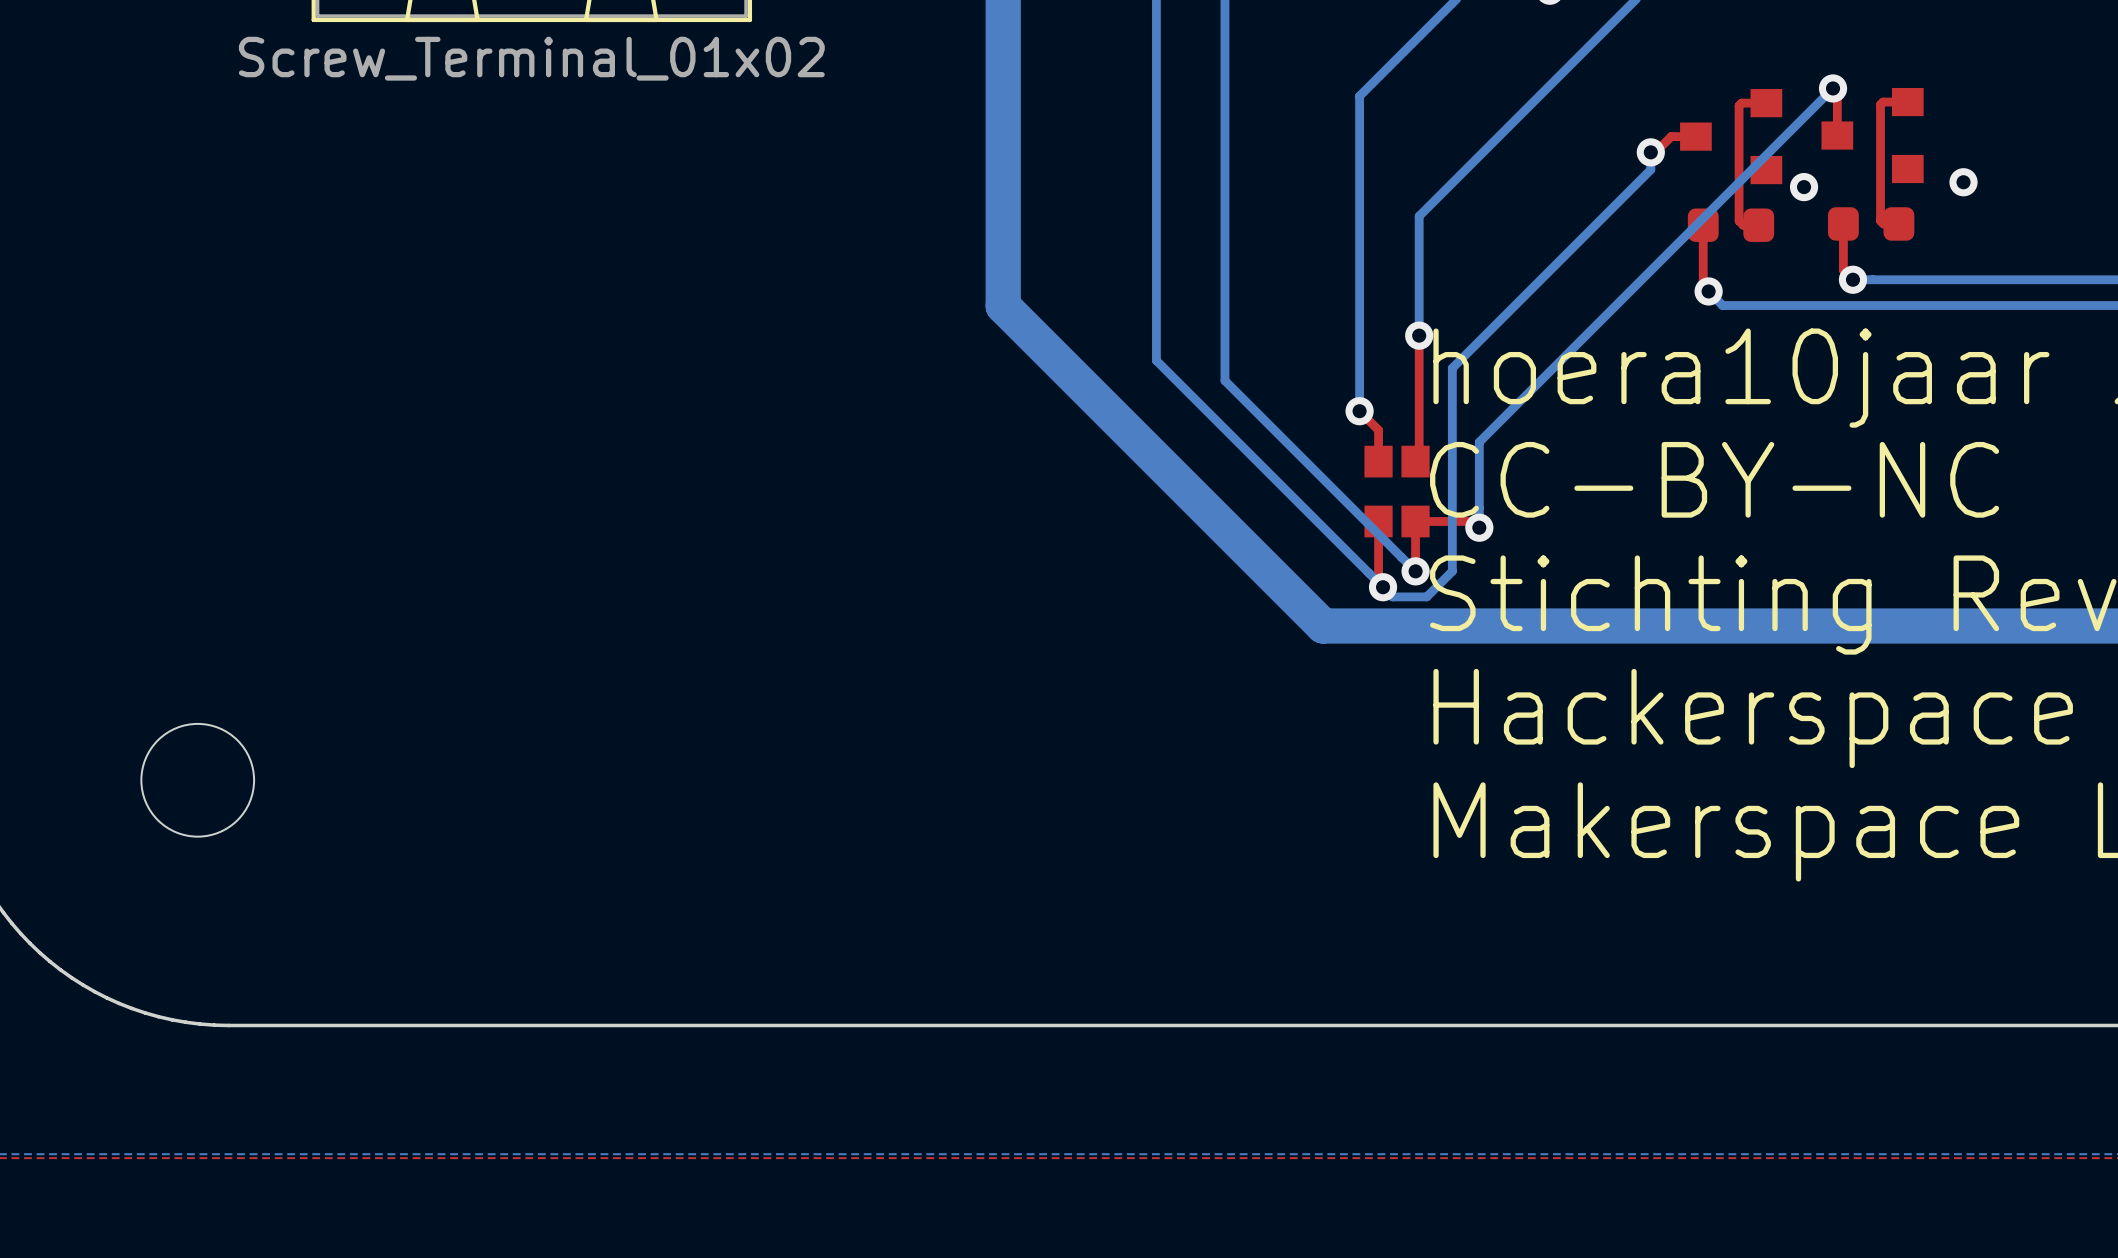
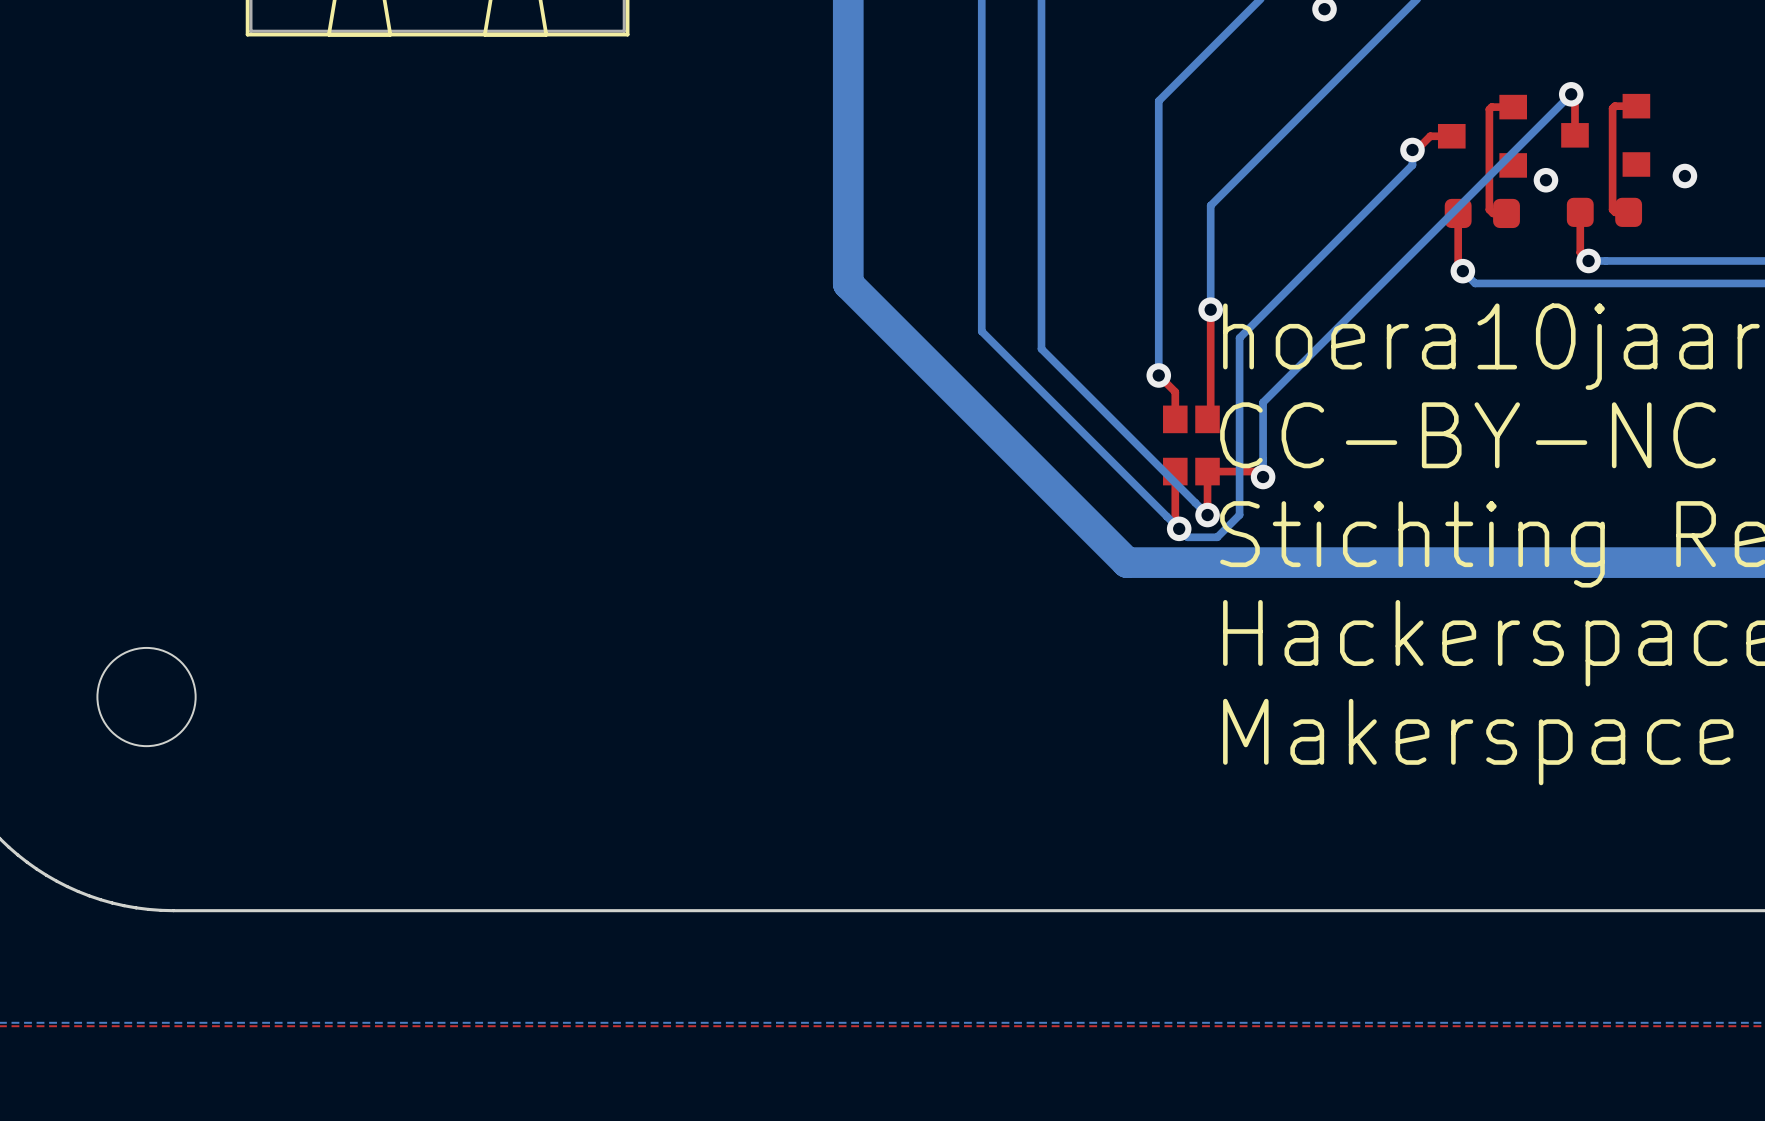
part value: Screw_Terminal_01x02 (531, 58) -> none

